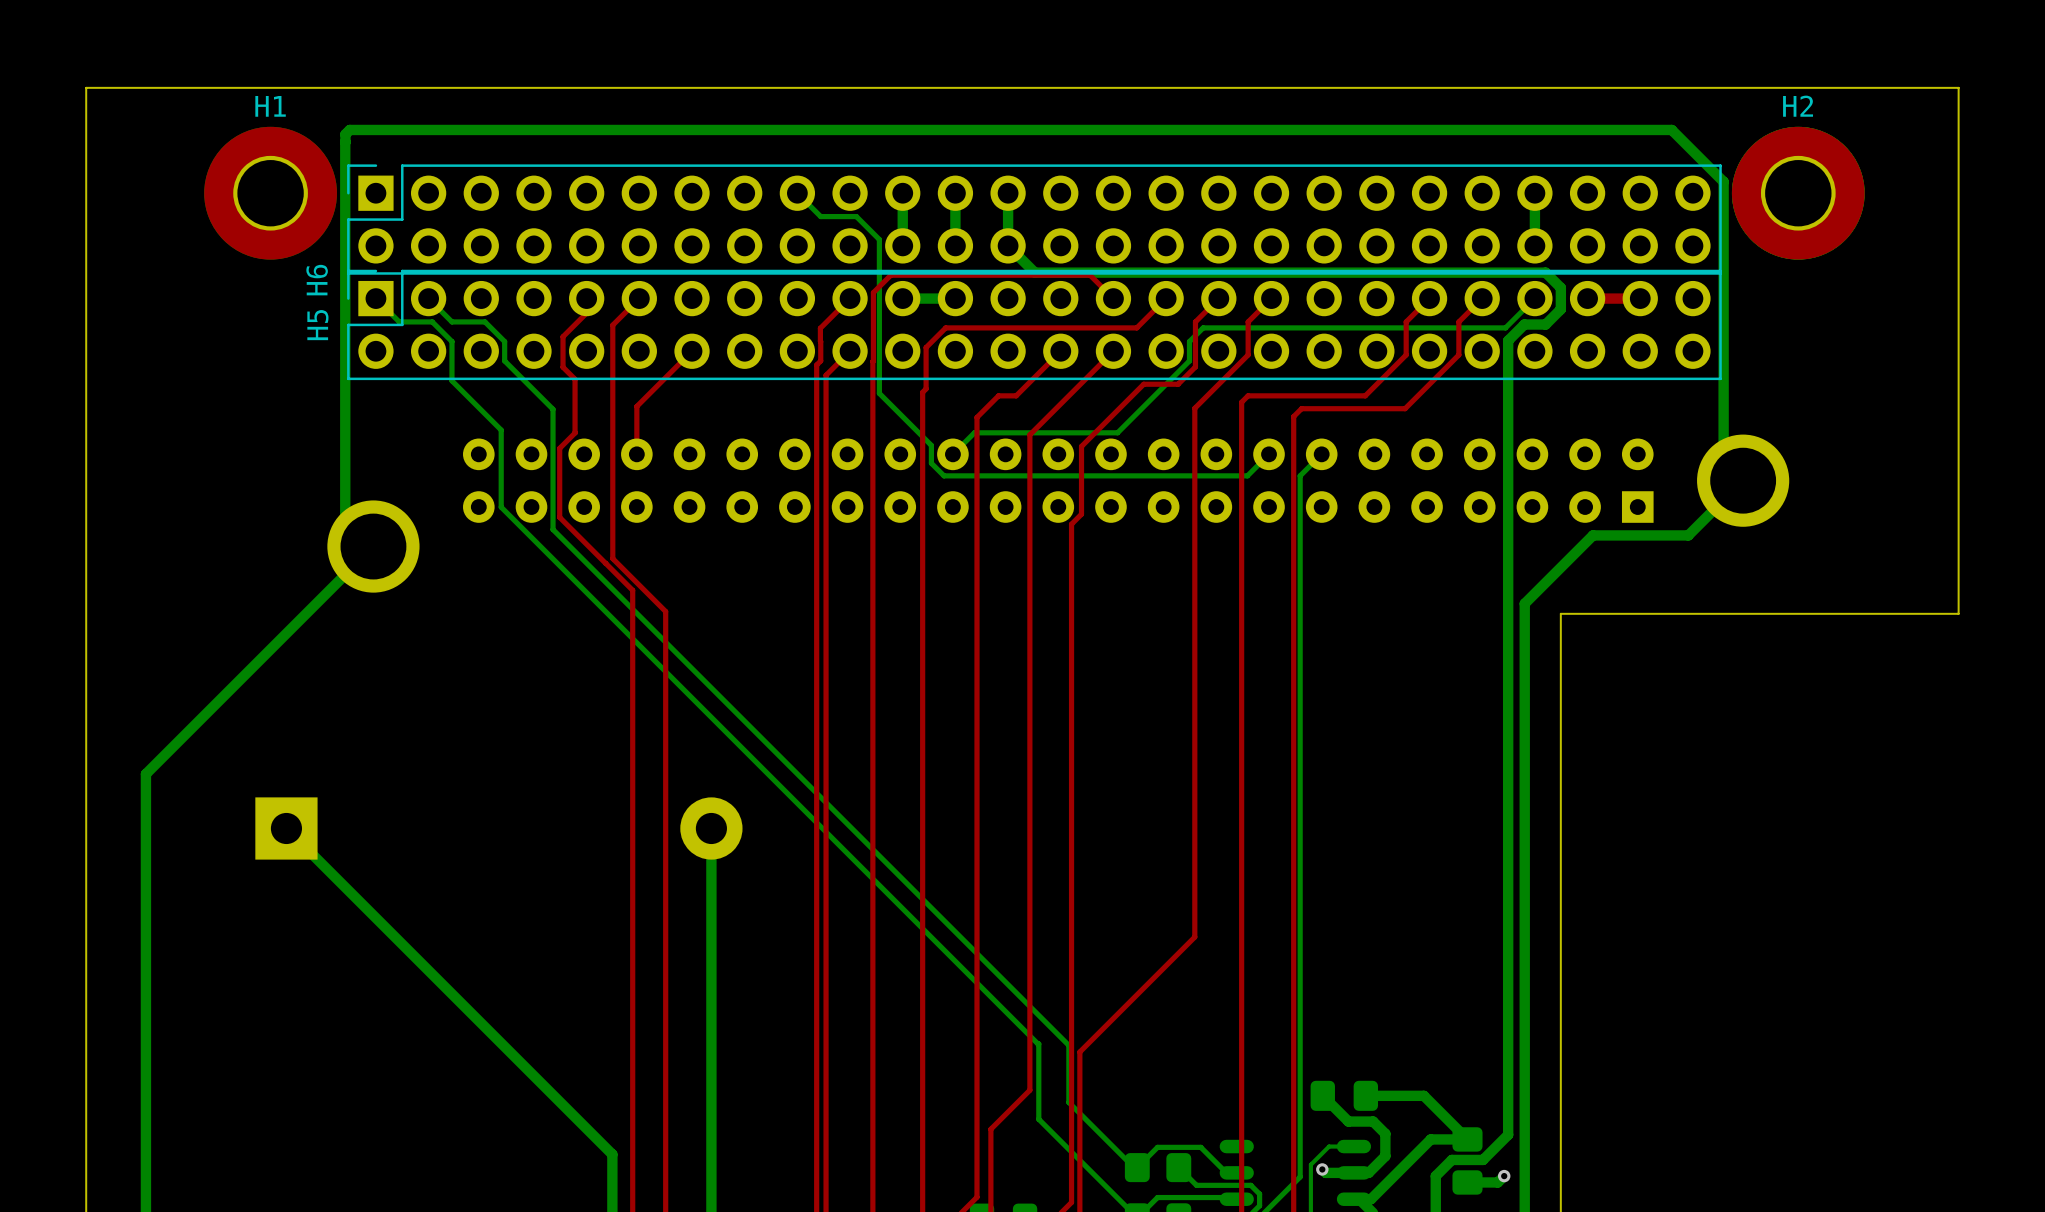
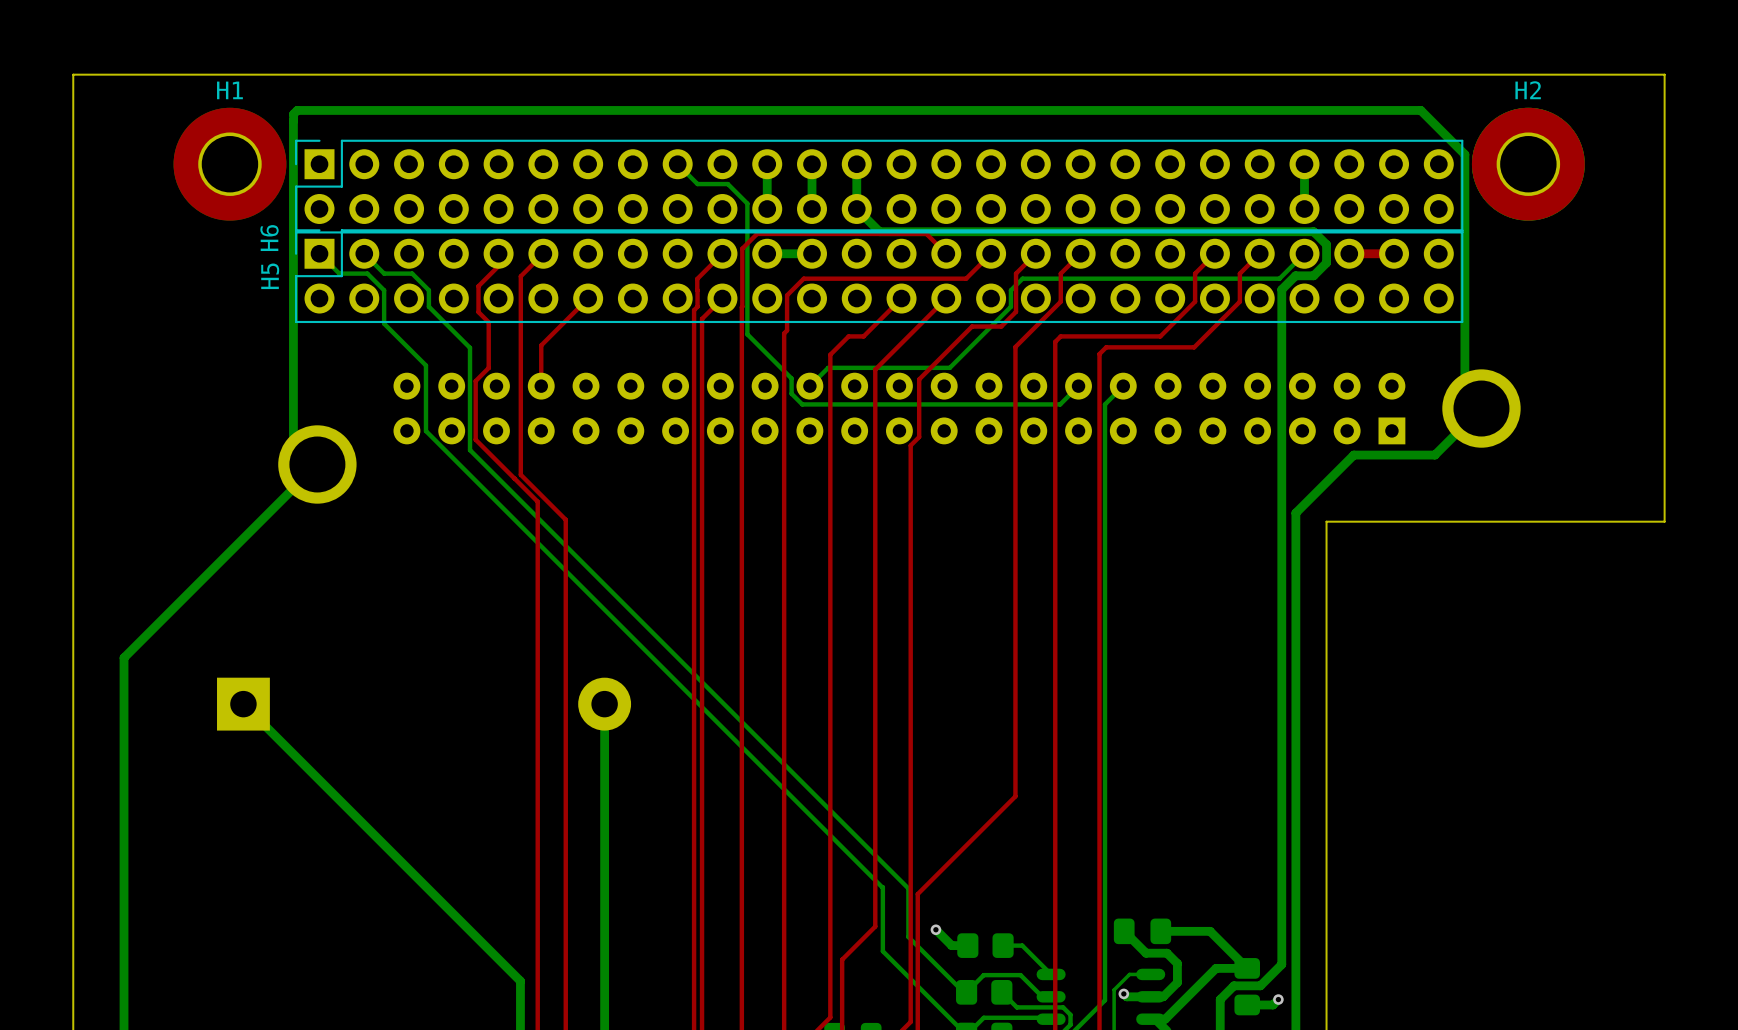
bottom track: none -> (935, 929) (951, 945) (967, 945)
via: none -> (935, 929)
part: none -> (985, 945)
bottom track: none -> (1003, 945) (1022, 945) (1051, 974)

